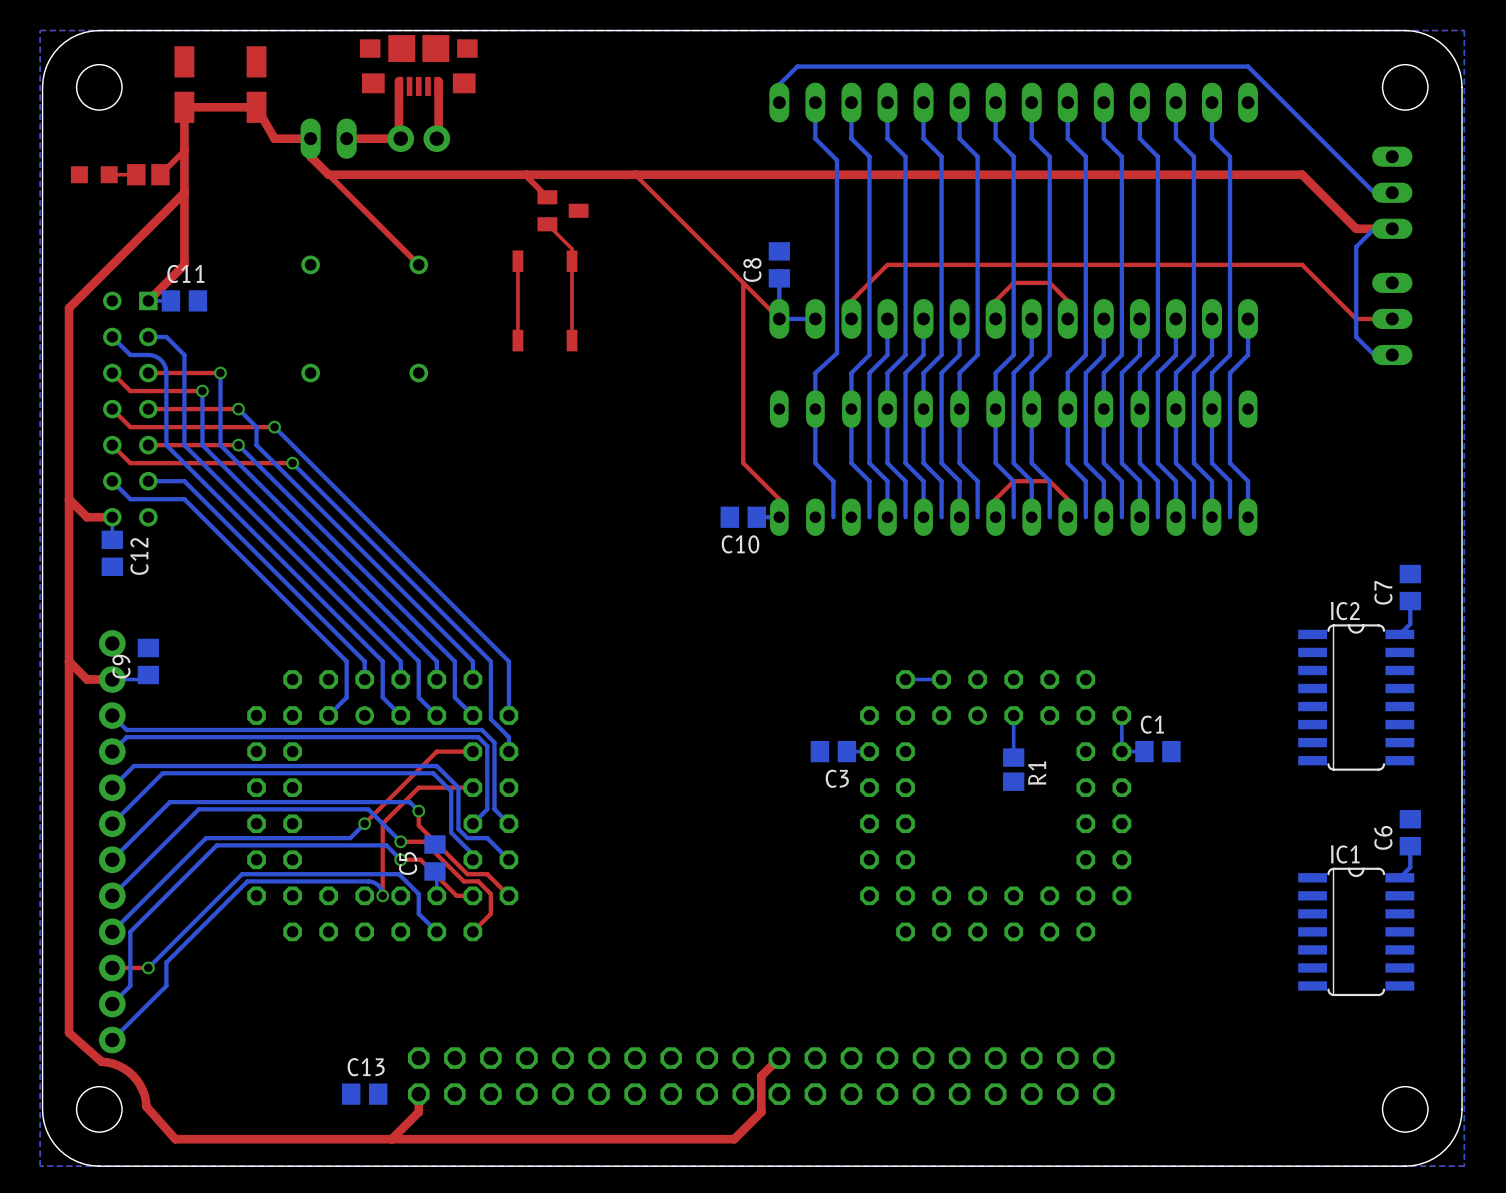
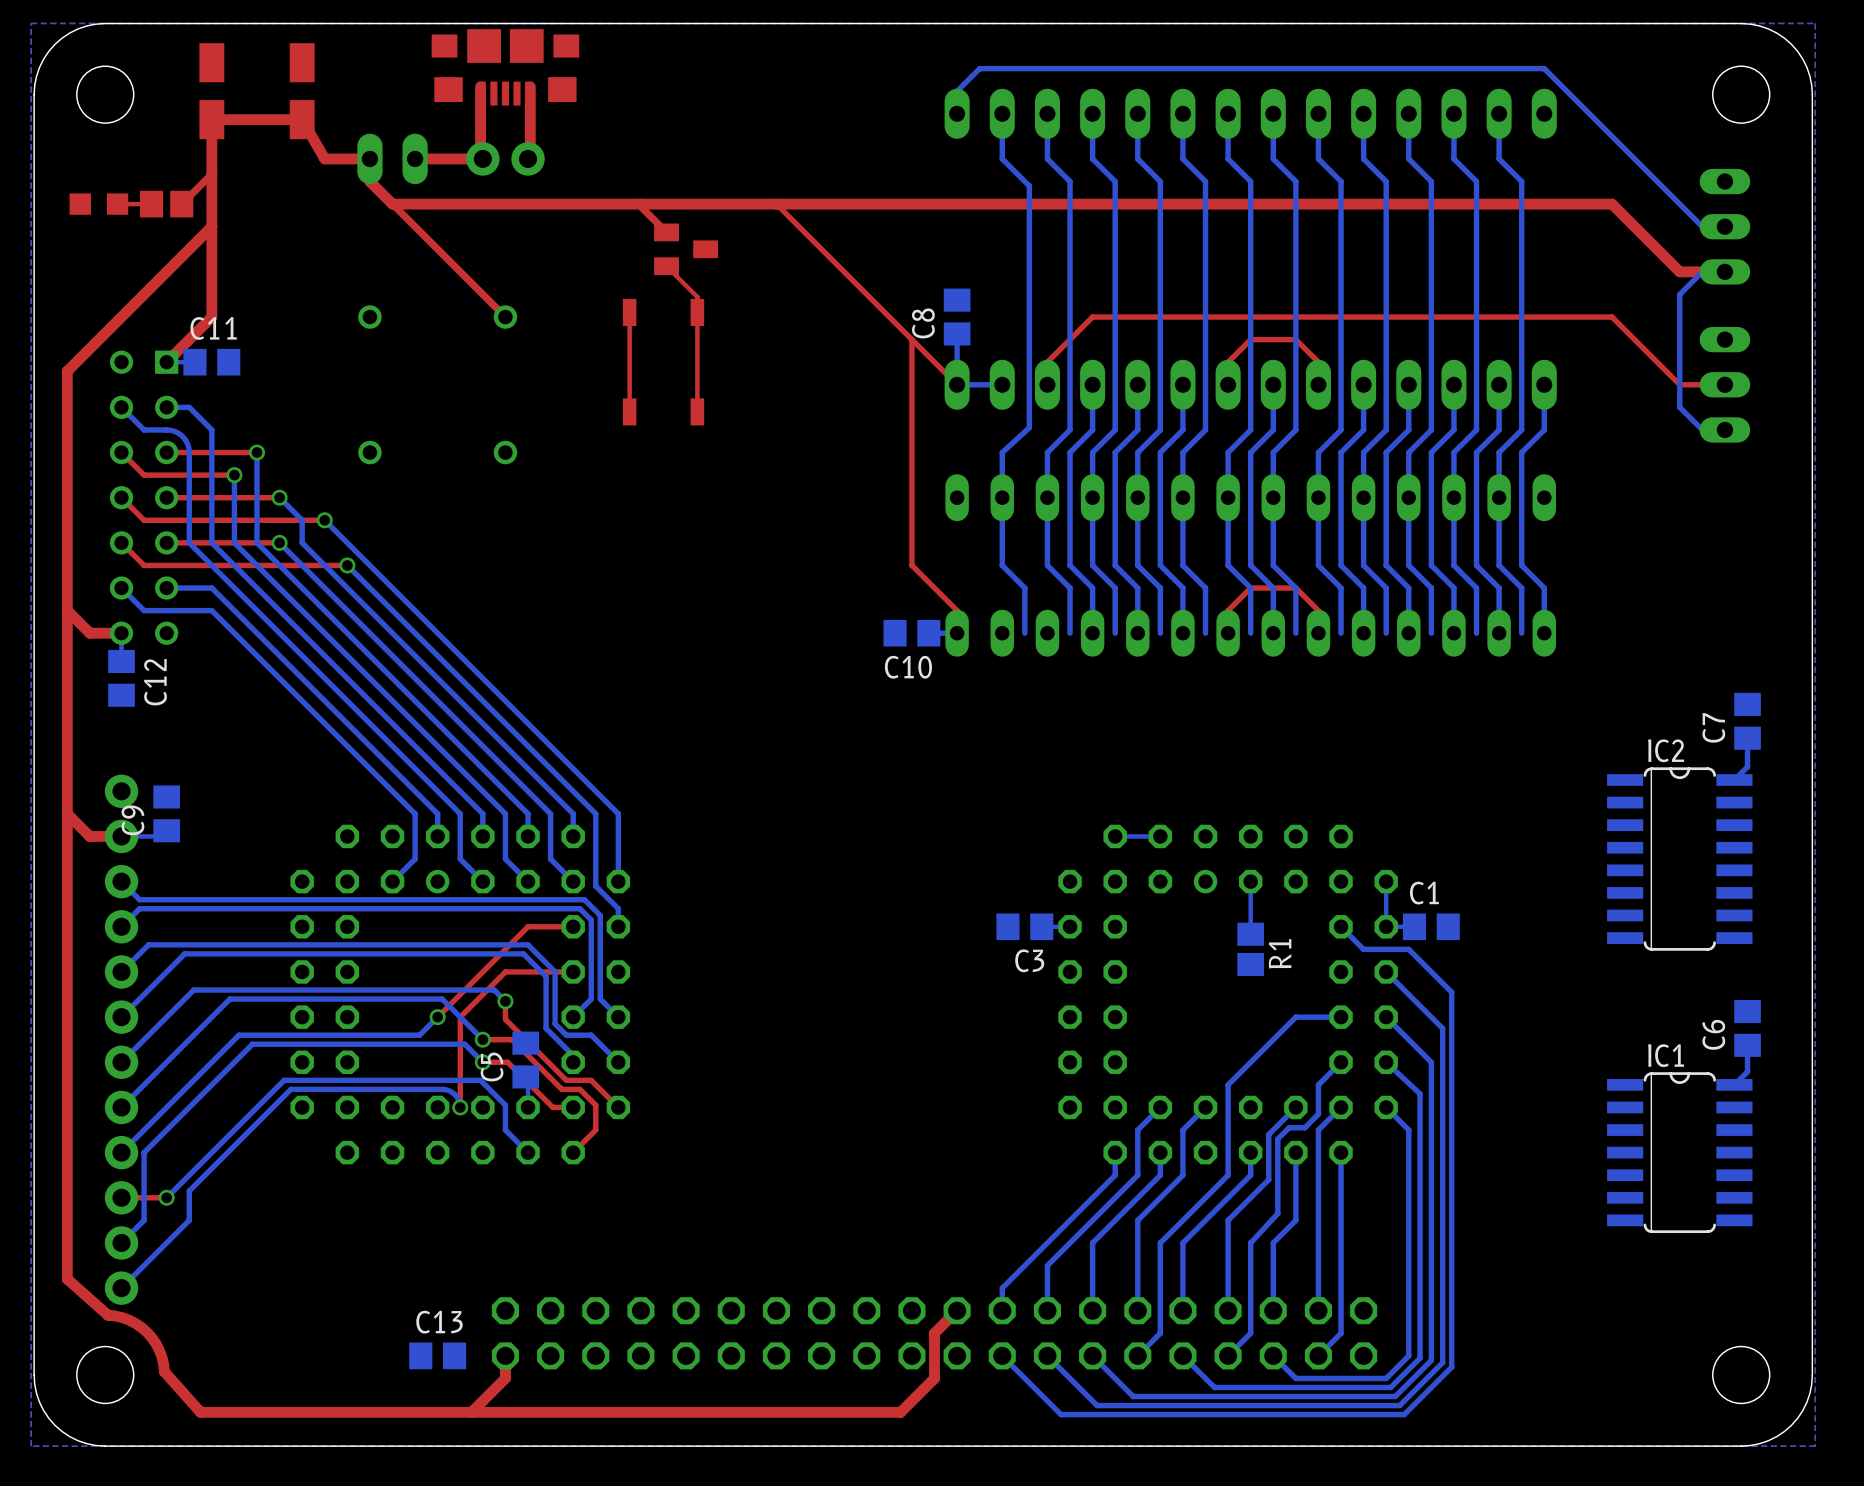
bottom track: none -> (1341, 926) (1363, 949) (1408, 949) (1451, 992) (1451, 1367) (1404, 1414) (1060, 1414) (1002, 1355)
bottom track: none -> (1386, 971) (1442, 1028) (1442, 1362) (1399, 1405) (1097, 1405) (1047, 1355)
bottom track: none -> (1341, 1017) (1295, 1017) (1228, 1084) (1228, 1175) (1160, 1242) (1160, 1333) (1137, 1355)
bottom track: none -> (1386, 1017) (1431, 1062) (1431, 1360) (1395, 1396) (1133, 1396) (1092, 1355)
bottom track: none -> (1341, 1062) (1318, 1084) (1318, 1114) (1304, 1127) (1289, 1127) (1277, 1139) (1277, 1213) (1250, 1242) (1250, 1333) (1228, 1355)
bottom track: none -> (1386, 1062) (1420, 1093) (1420, 1358) (1390, 1387) (1214, 1387) (1182, 1355)
bottom track: none -> (1160, 1107) (1137, 1130) (1137, 1175) (1047, 1265) (1047, 1310)
bottom track: none -> (1205, 1107) (1182, 1130) (1182, 1175) (1137, 1220) (1137, 1310)
bottom track: none -> (1295, 1107) (1268, 1134) (1268, 1179) (1228, 1220) (1228, 1310)
bottom track: none -> (1341, 1107) (1318, 1130) (1318, 1310)
bottom track: none -> (1386, 1107) (1408, 1130) (1408, 1355) (1386, 1378) (1295, 1378) (1273, 1355)
bottom track: none -> (1115, 1152) (1115, 1175) (1002, 1288) (1002, 1310)
bottom track: none -> (1160, 1152) (1160, 1175) (1092, 1242) (1092, 1310)
bottom track: none -> (1250, 1152) (1250, 1175) (1182, 1242) (1182, 1310)
bottom track: none -> (1295, 1152) (1295, 1220) (1273, 1242) (1273, 1310)
bottom track: none -> (1341, 1152) (1341, 1333) (1318, 1355)

